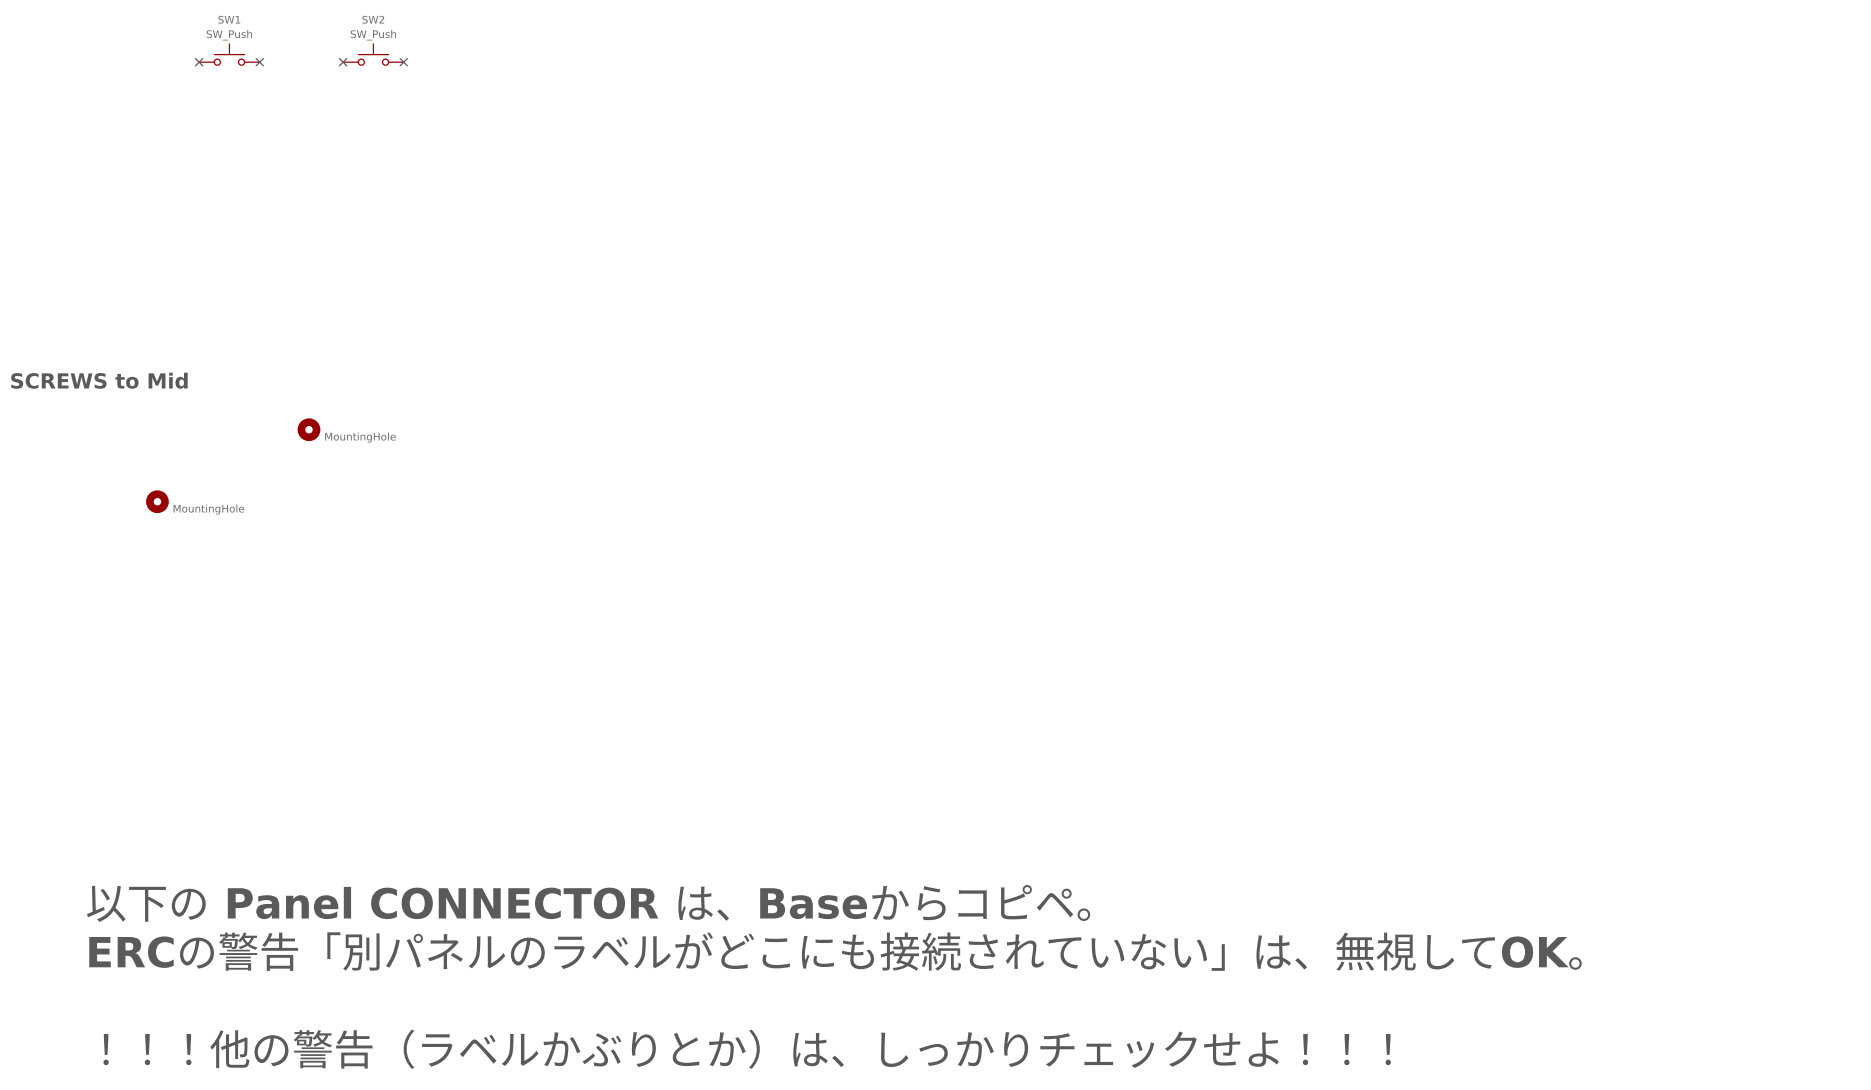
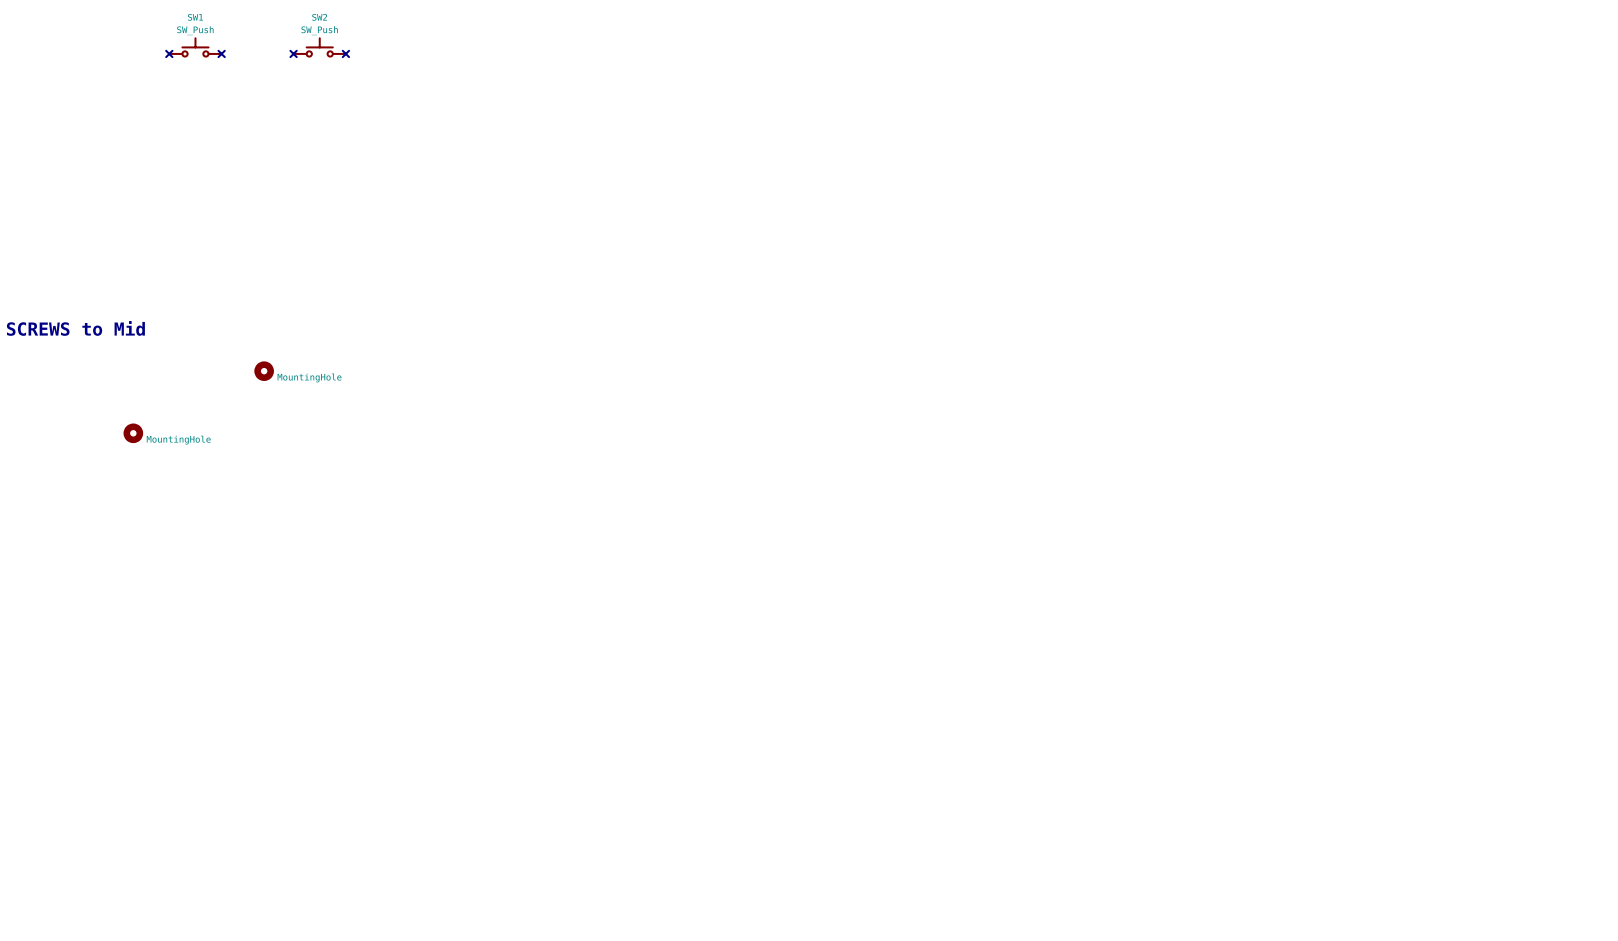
text: 以下の Panel CONNECTOR は、Baseからコピペ。 (588, 903) -> none
text: ERCの警告「別パネルのラベルがどこにも接続されていない」は、無視してOK。 (835, 951) -> none
text: ！！！他の警告（ラベルかぶりとか）は、しっかりチェックせよ！！！ (747, 1049) -> none

